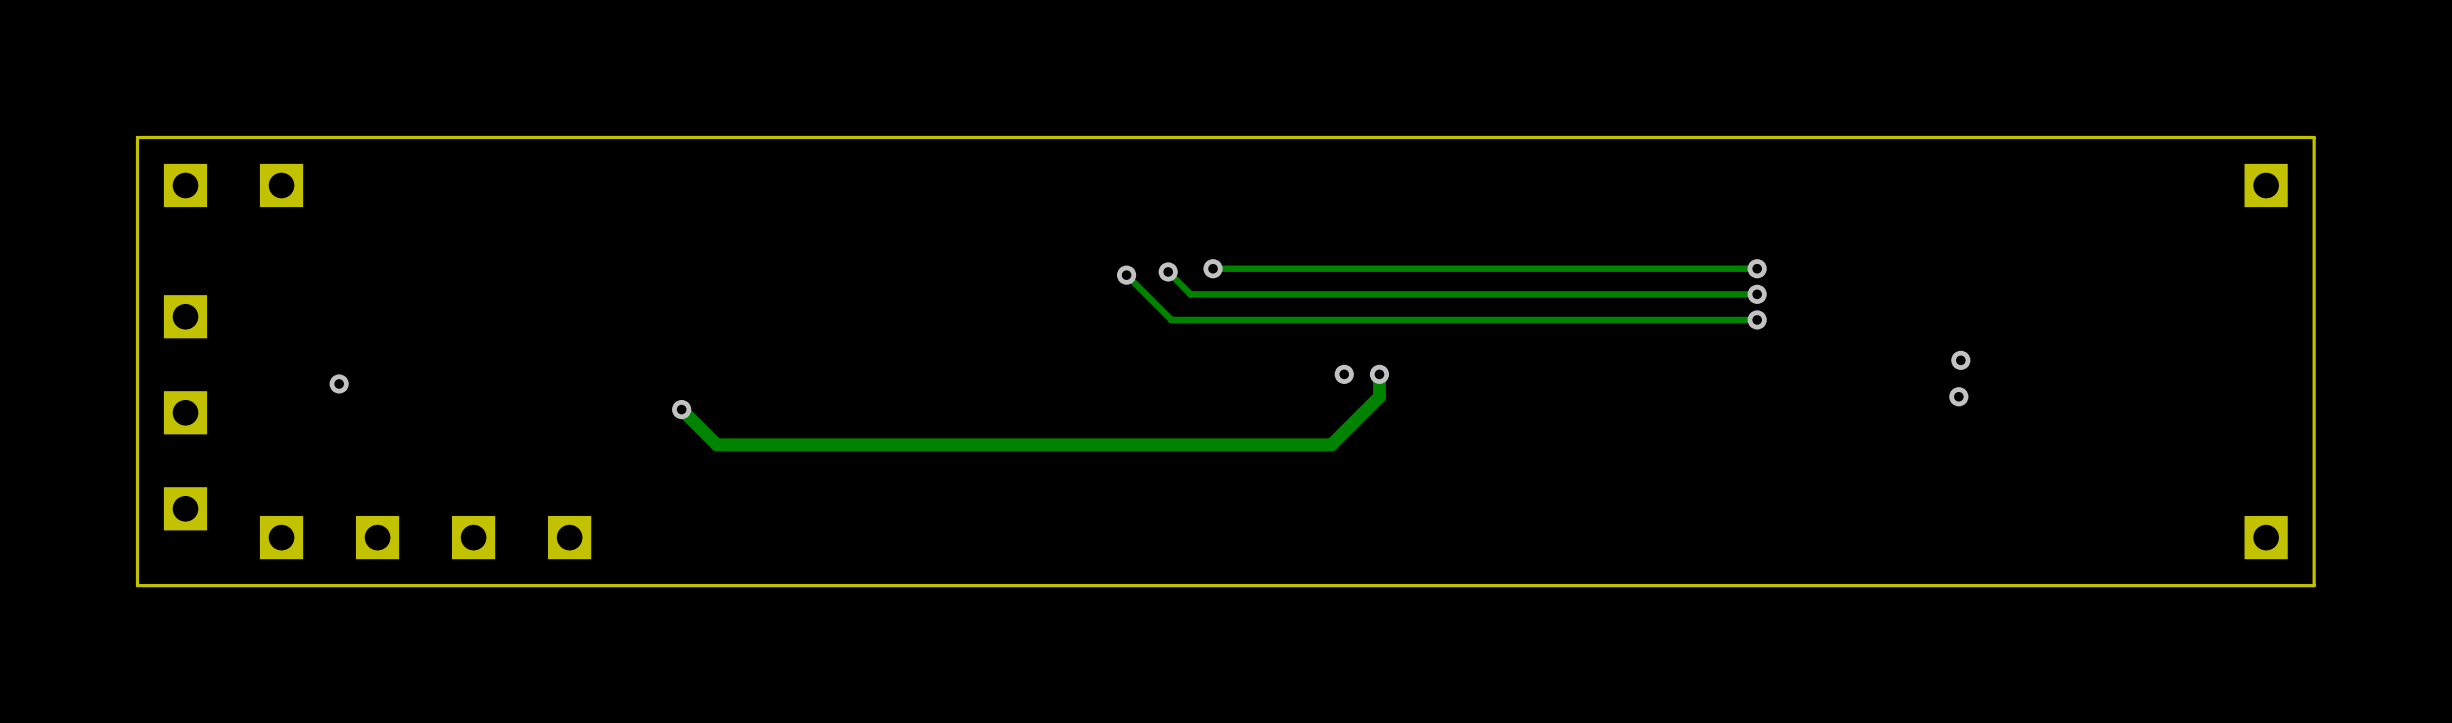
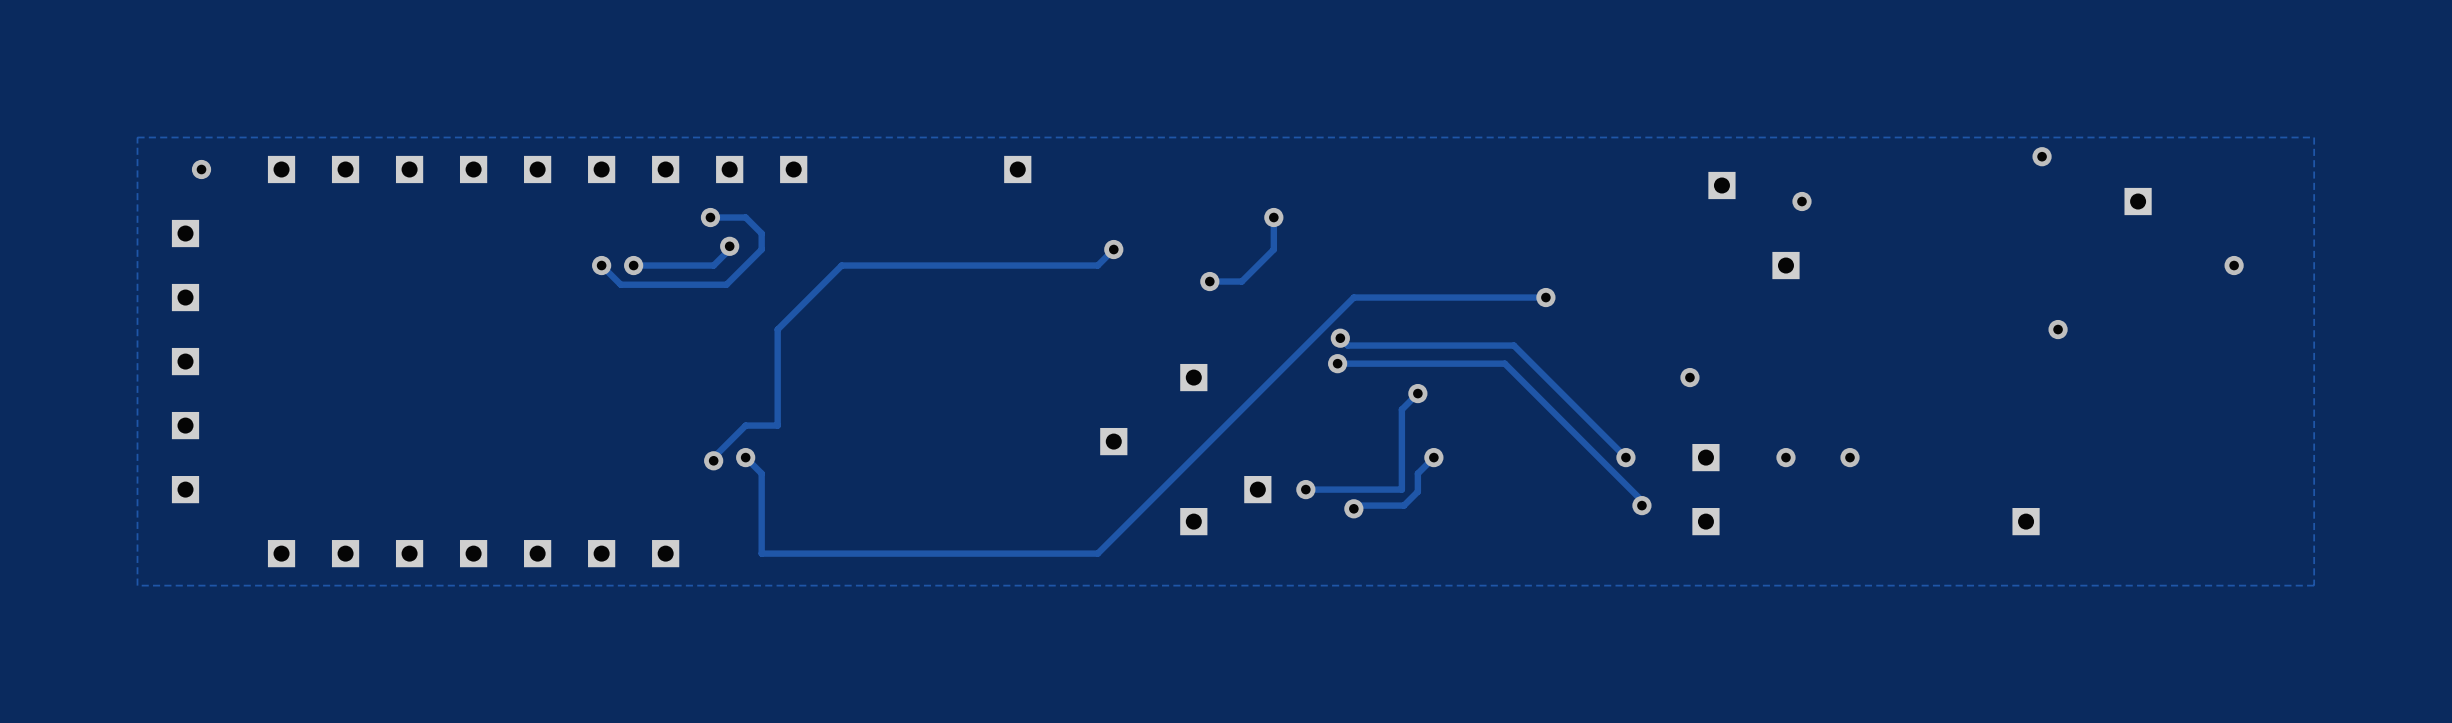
board edge: (2314, 137) (2314, 585) (137, 585) (137, 137) (2314, 137) -> none
via: none -> (2042, 156)
part footprint: [259, 163, 304, 208] -> [267, 155, 296, 184]
via: none -> (201, 169)
part: none -> (345, 169)
part: none -> (409, 169)
part: none -> (473, 169)
part: none -> (537, 169)
part: none -> (601, 169)
part: none -> (665, 169)
part: none -> (729, 169)
part: none -> (793, 169)
part: none -> (1017, 169)
part: (185, 185) -> none
part: none -> (1721, 185)
part: (2266, 185) -> none
via: none -> (1801, 201)
part: none -> (2138, 201)
track: none -> (710, 217) (745, 217) (761, 233) (761, 249) (726, 284) (620, 284) (601, 265)
via: none -> (710, 217)
track: none -> (1273, 217) (1273, 249) (1241, 281) (1209, 281)
via: none -> (1273, 217)
part: none -> (185, 233)
track: none -> (729, 246) (729, 249) (713, 265) (633, 265)
via: none -> (729, 246)
track: none -> (1113, 249) (1097, 265) (841, 265) (777, 329) (777, 425) (745, 425) (713, 457) (713, 460)
via: none -> (601, 265)
via: none -> (633, 265)
part: none -> (1785, 265)
via: none -> (2234, 265)
via position: (1213, 268) -> (1209, 281)
track: (1757, 268) (1213, 268) -> none
via: (1757, 268) -> none
track: (1168, 271) (1190, 294) (1757, 294) -> none
via: (1168, 271) -> none
track: (1126, 275) (1171, 319) (1757, 319) -> none
via position: (1126, 275) -> (1113, 249)
via: (1757, 294) -> none
part footprint: [163, 295, 208, 339] -> [171, 283, 200, 312]
track: none -> (1545, 297) (1353, 297) (1097, 553) (761, 553) (761, 473) (745, 457)
via: none -> (1545, 297)
via: (1757, 319) -> none
via: none -> (2058, 329)
track: none -> (1340, 338) (1347, 345) (1513, 345) (1625, 457)
via: none -> (1340, 338)
via: (1960, 360) -> none
part: none -> (185, 361)
track: none -> (1337, 363) (1504, 363) (1641, 500) (1641, 505)
via position: (1344, 374) -> (1337, 363)
track: (1379, 374) (1379, 396) (1331, 444) (716, 444) (681, 409) -> none
via: (1379, 374) -> none
part: none -> (1193, 377)
via: none -> (1689, 377)
via: (339, 383) -> none
part footprint: [163, 391, 208, 435] -> [171, 411, 200, 440]
track: none -> (1417, 393) (1401, 409) (1401, 489) (1305, 489)
via: none -> (1417, 393)
via: (1958, 396) -> none
via: (681, 409) -> none
part: none -> (1113, 441)
via: none -> (745, 457)
track: none -> (1433, 457) (1417, 473) (1417, 491) (1403, 505) (1353, 505) (1353, 508)
via: none -> (1433, 457)
via: none -> (1625, 457)
part: none -> (1705, 457)
via: none -> (1785, 457)
via: none -> (1850, 457)
via: none -> (713, 460)
part footprint: [163, 487, 208, 531] -> [171, 475, 200, 504]
part: none -> (1257, 489)
via: none -> (1305, 489)
via: none -> (1641, 505)
via: none -> (1353, 508)
part footprint: [259, 516, 304, 560] -> [267, 540, 296, 568]
part footprint: [451, 516, 496, 560] -> [459, 540, 488, 568]
part: none -> (1193, 521)
part: none -> (1705, 521)
part: none -> (2026, 521)
part: (377, 537) -> none
part: (569, 537) -> none
part: (2266, 537) -> none
part: none -> (345, 553)
part: none -> (409, 553)
part: none -> (537, 553)
part: none -> (601, 553)
part: none -> (665, 553)

